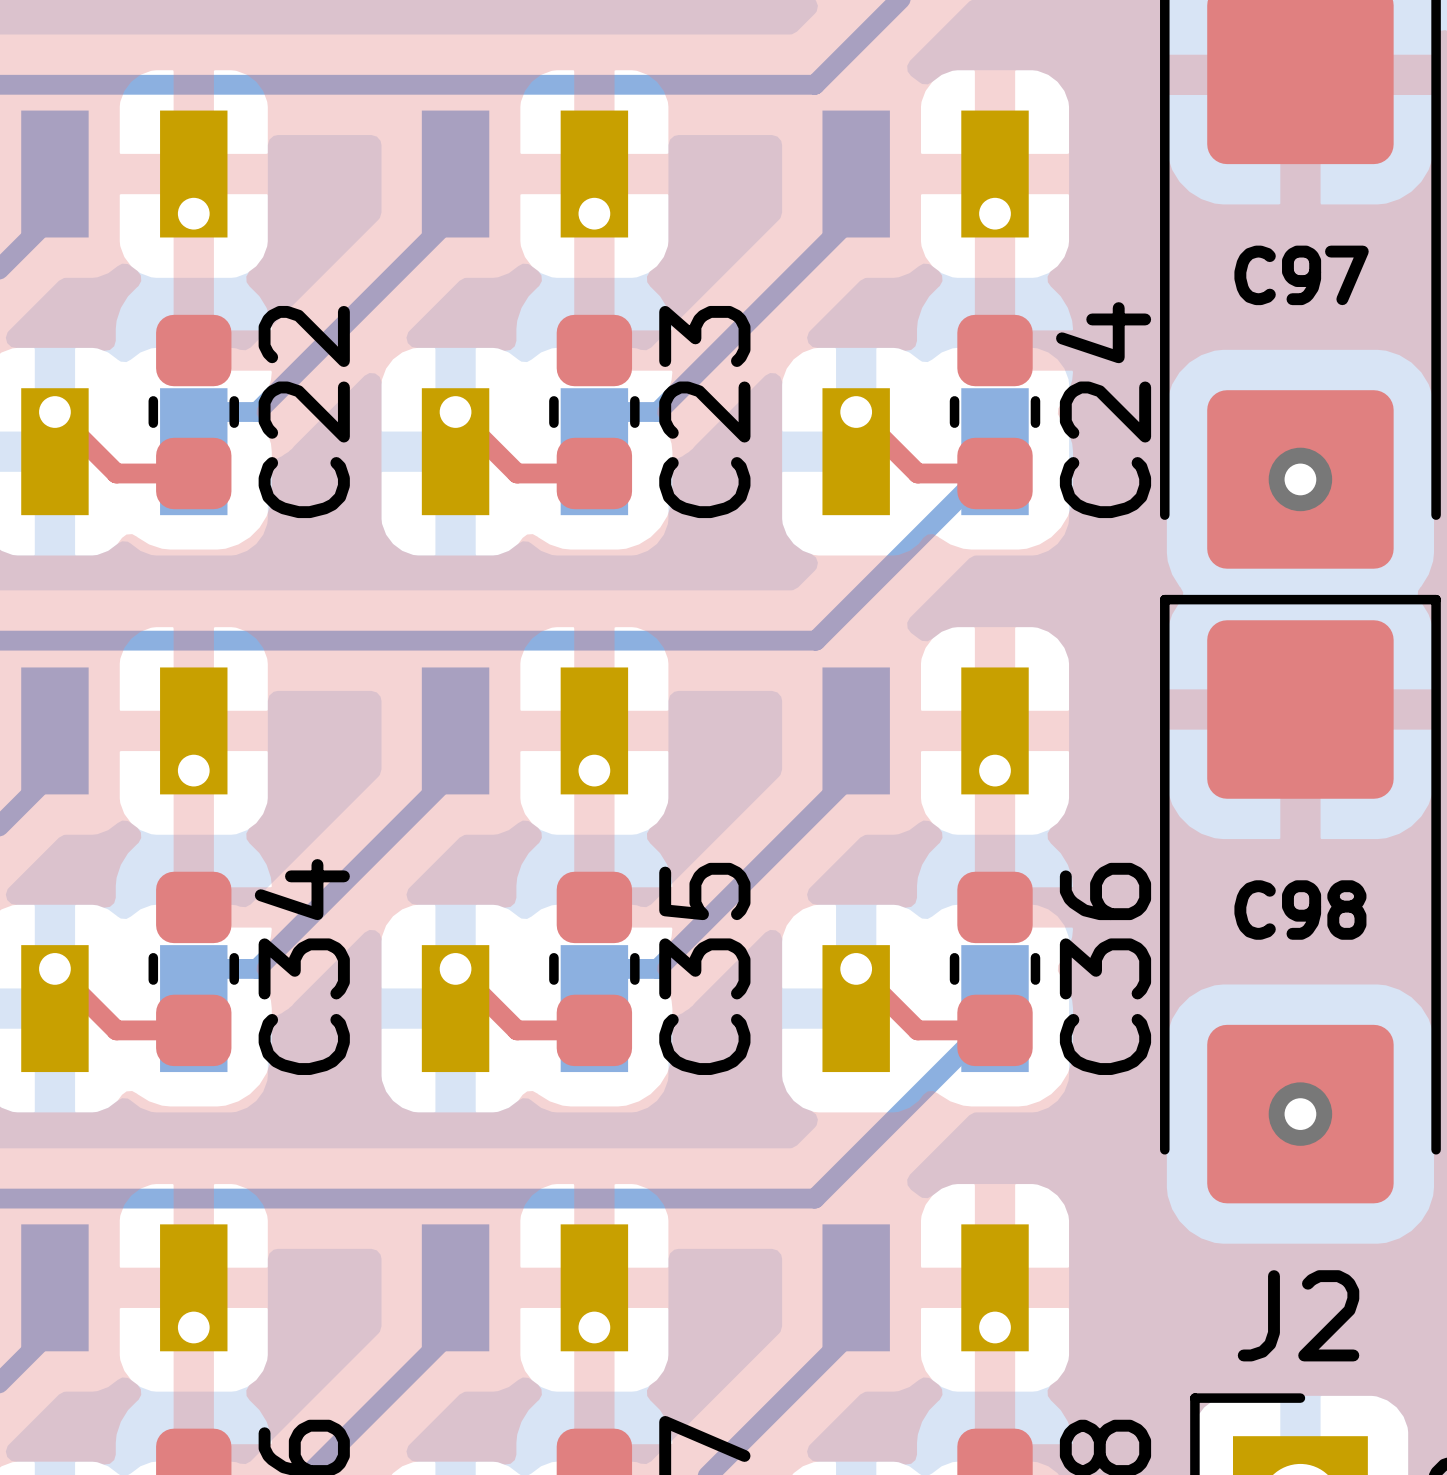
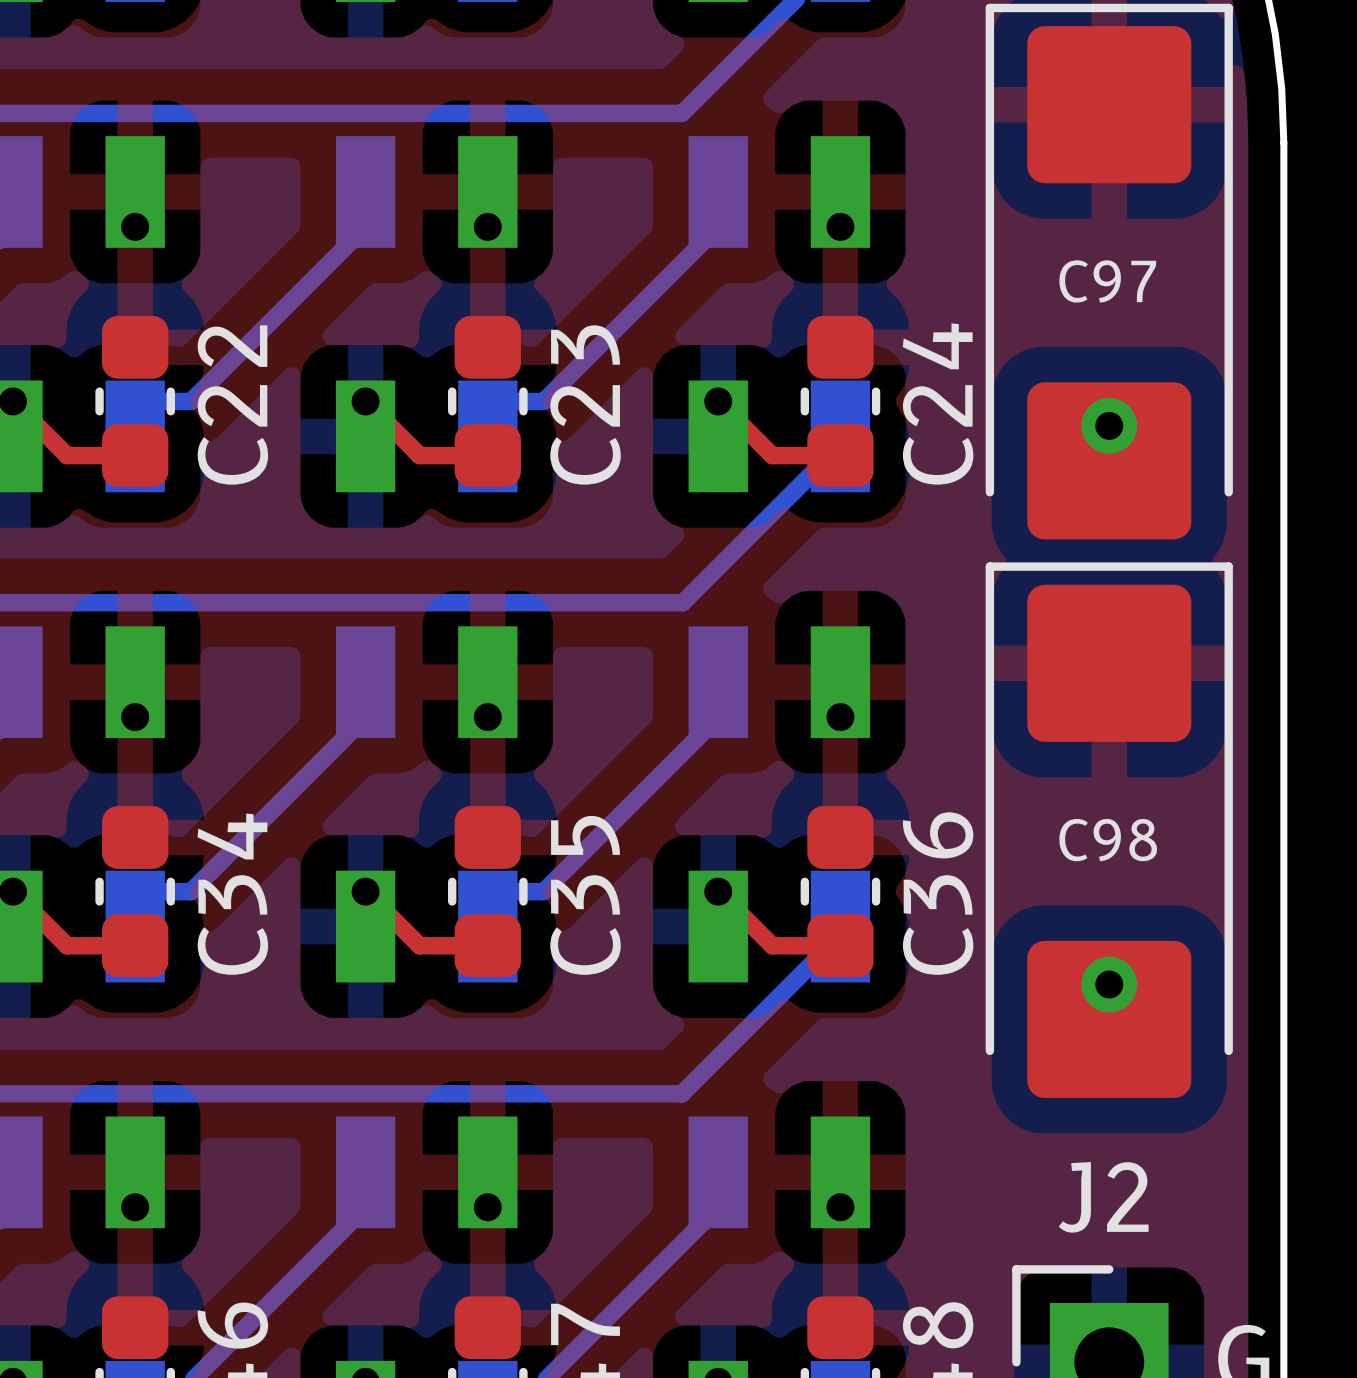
via position: (1300, 479) -> (1109, 425)
via position: (1300, 1114) -> (1109, 984)

